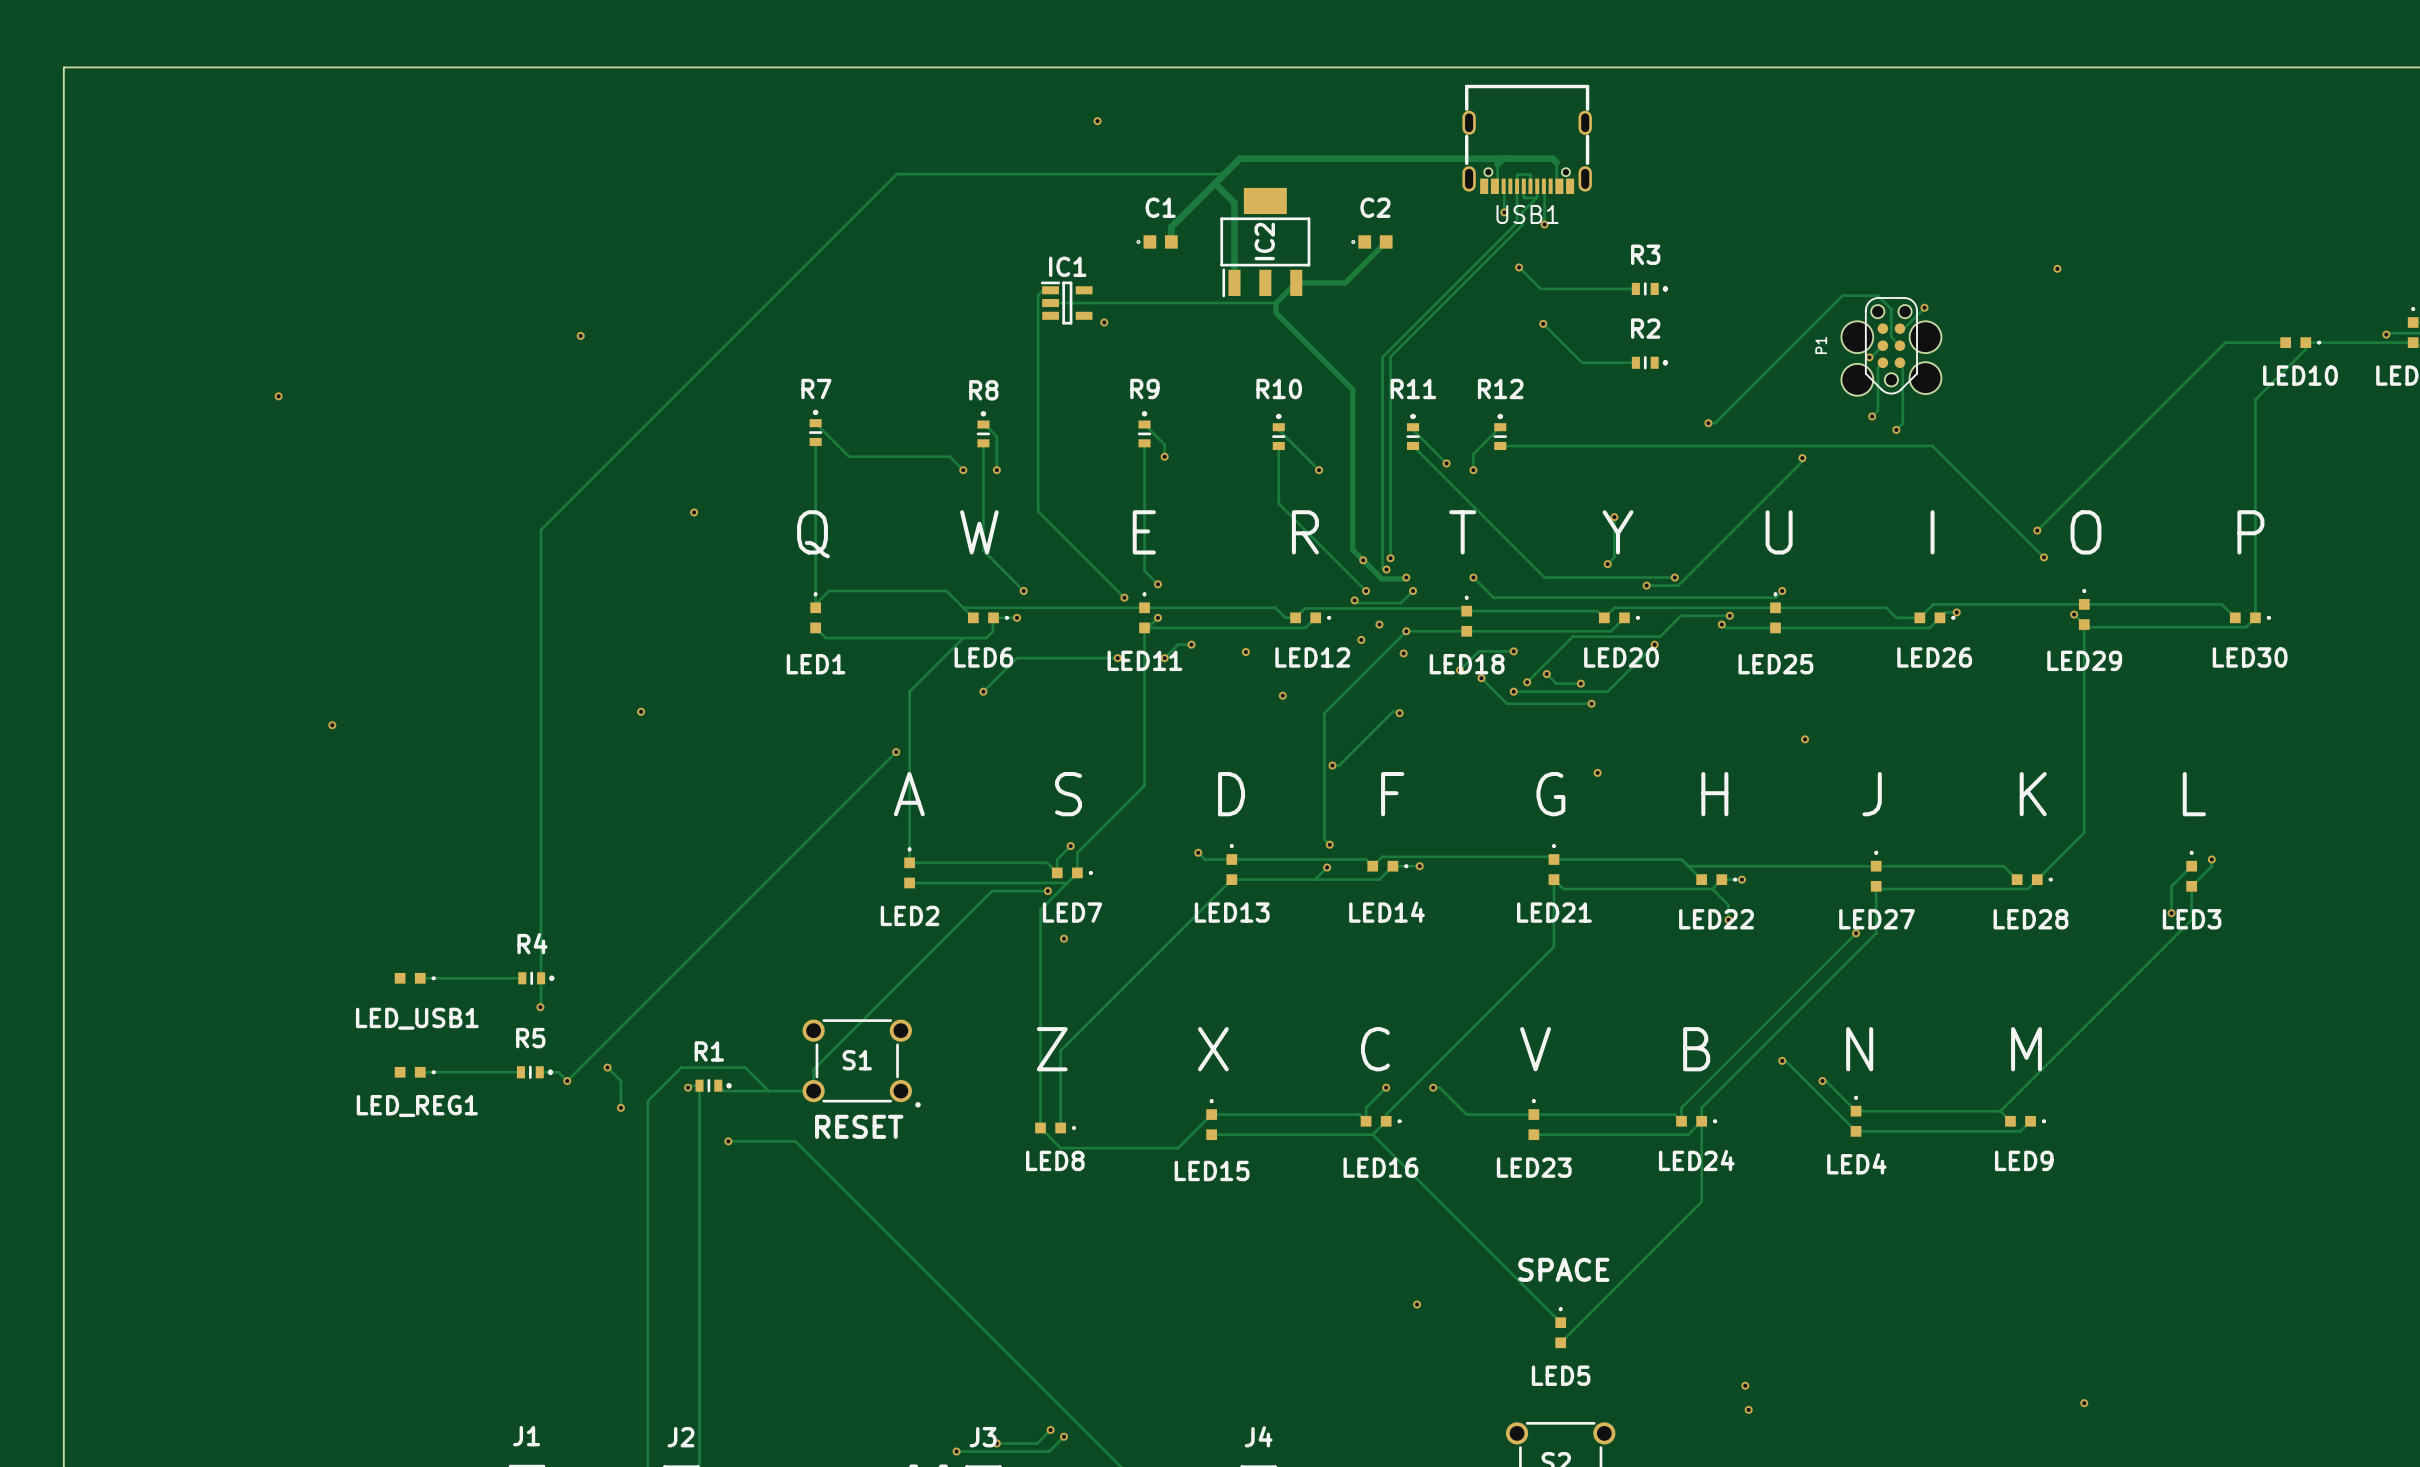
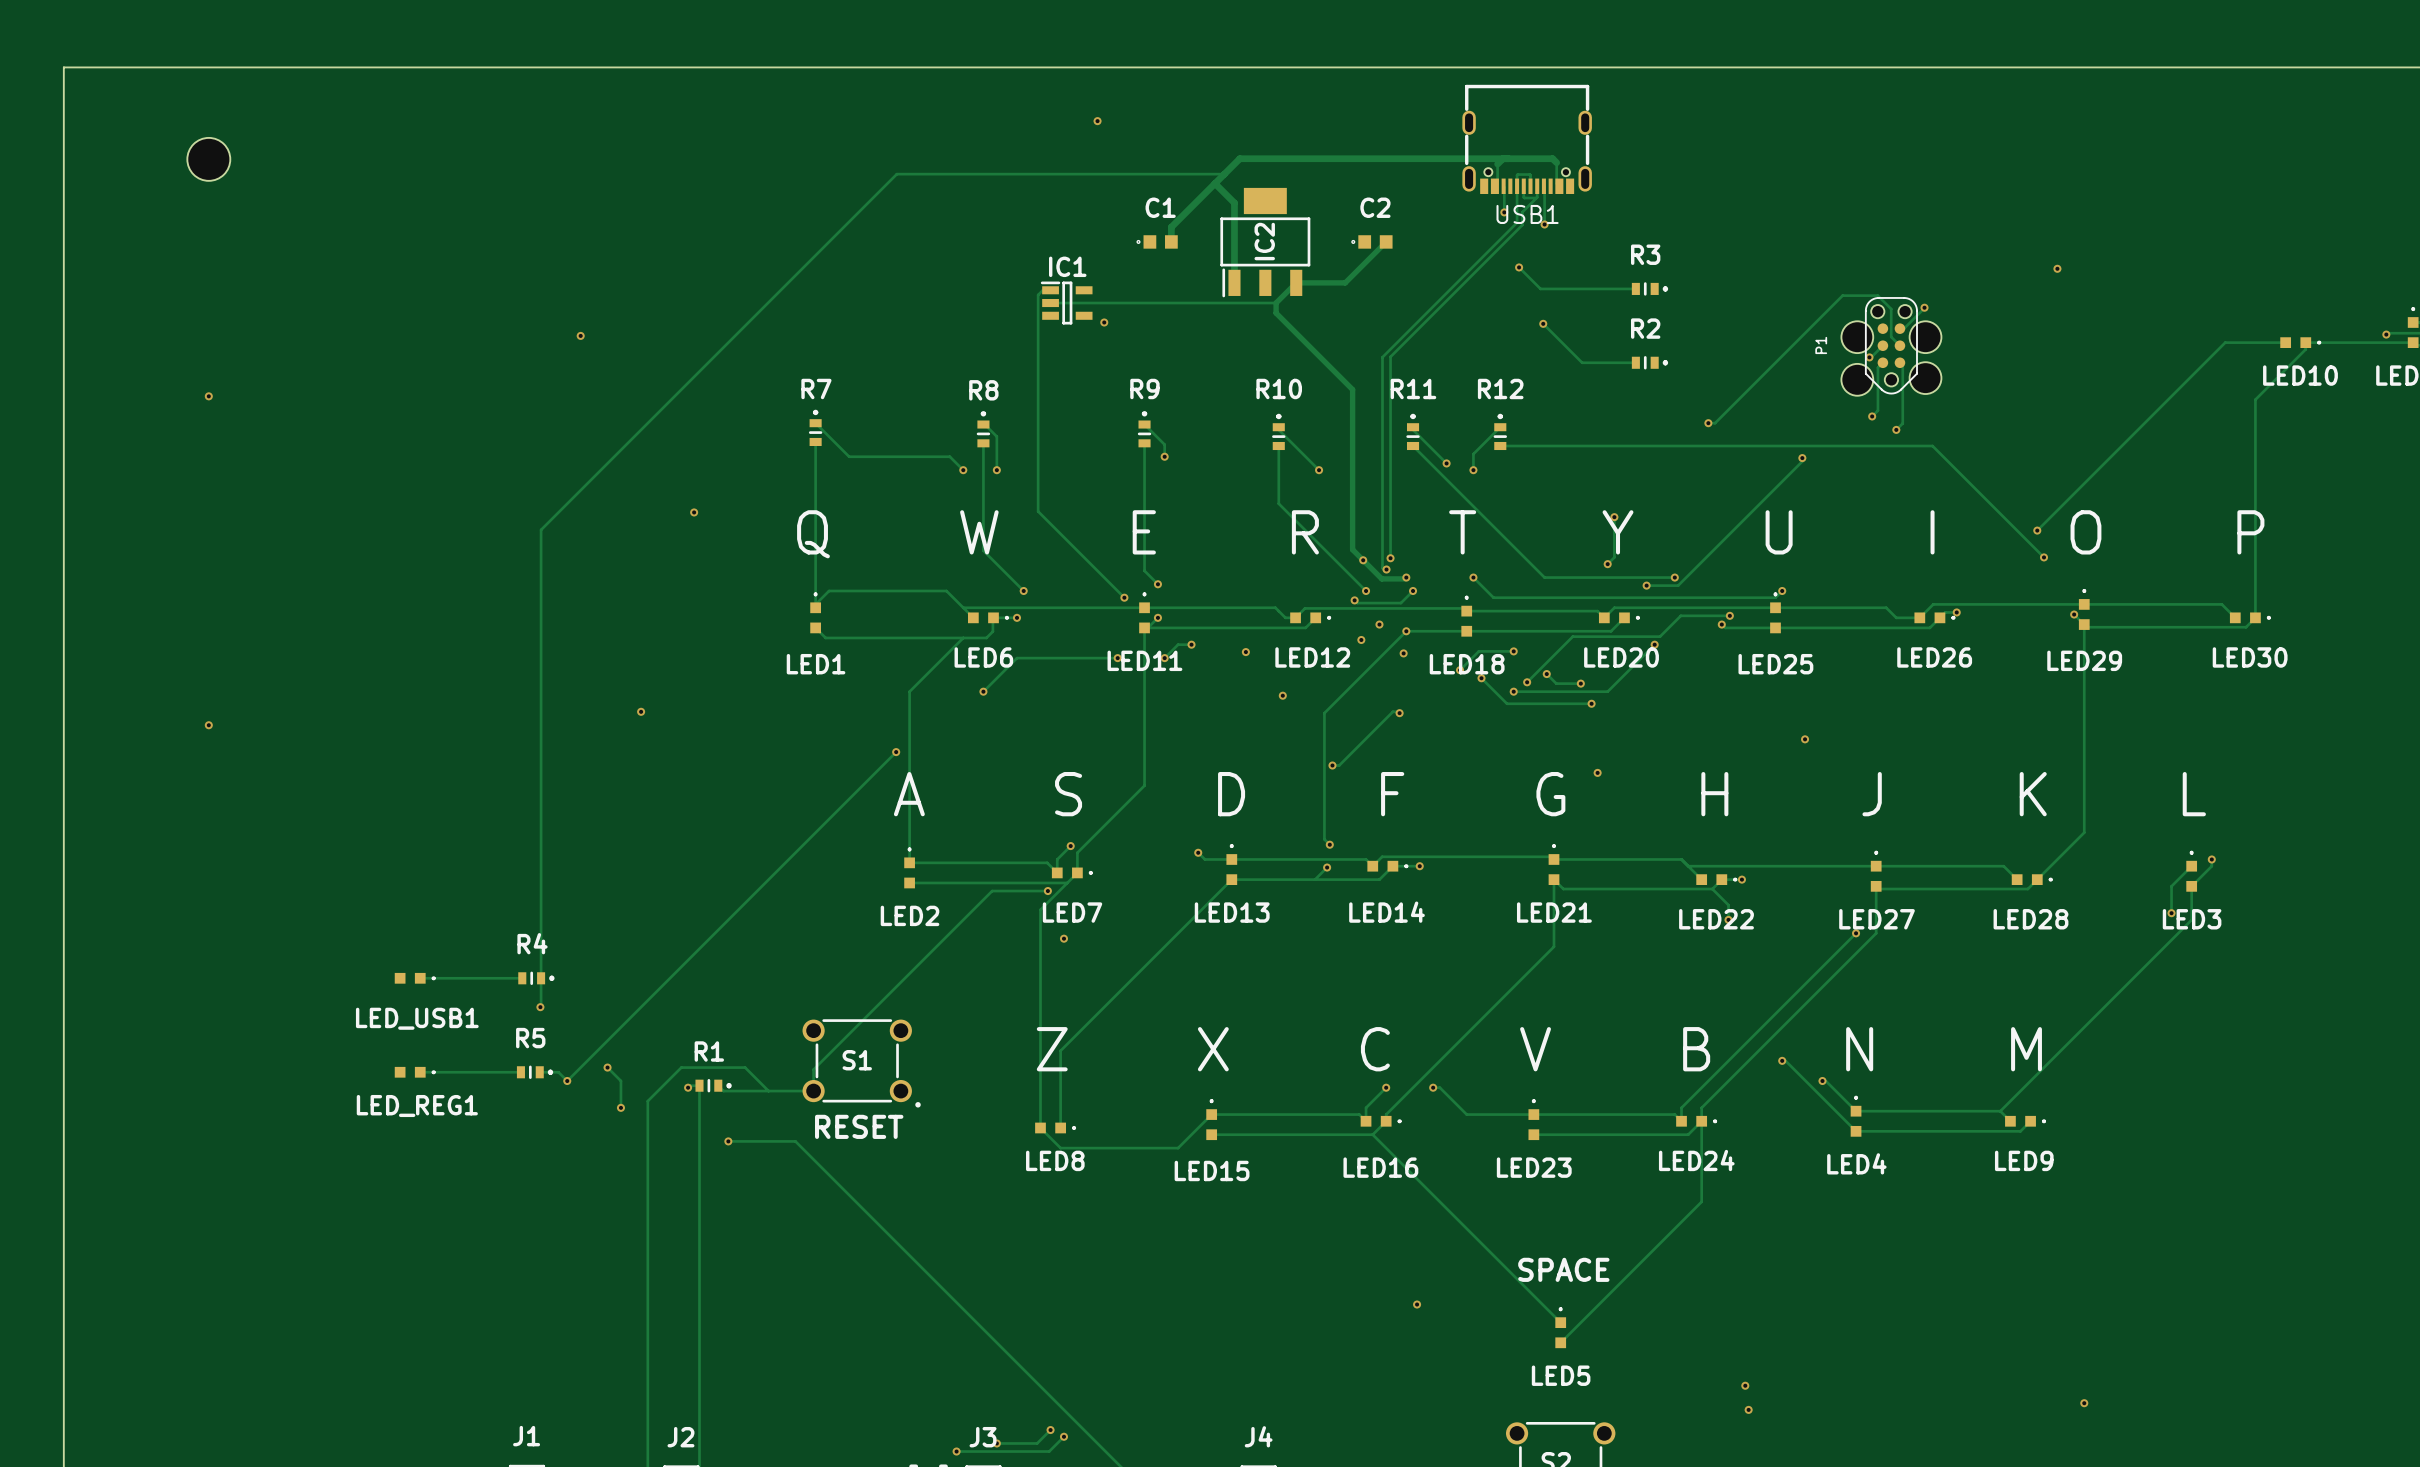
part: none -> (208, 159)
via position: (278, 396) -> (208, 396)
via: none -> (208, 725)
via: (332, 725) -> none

